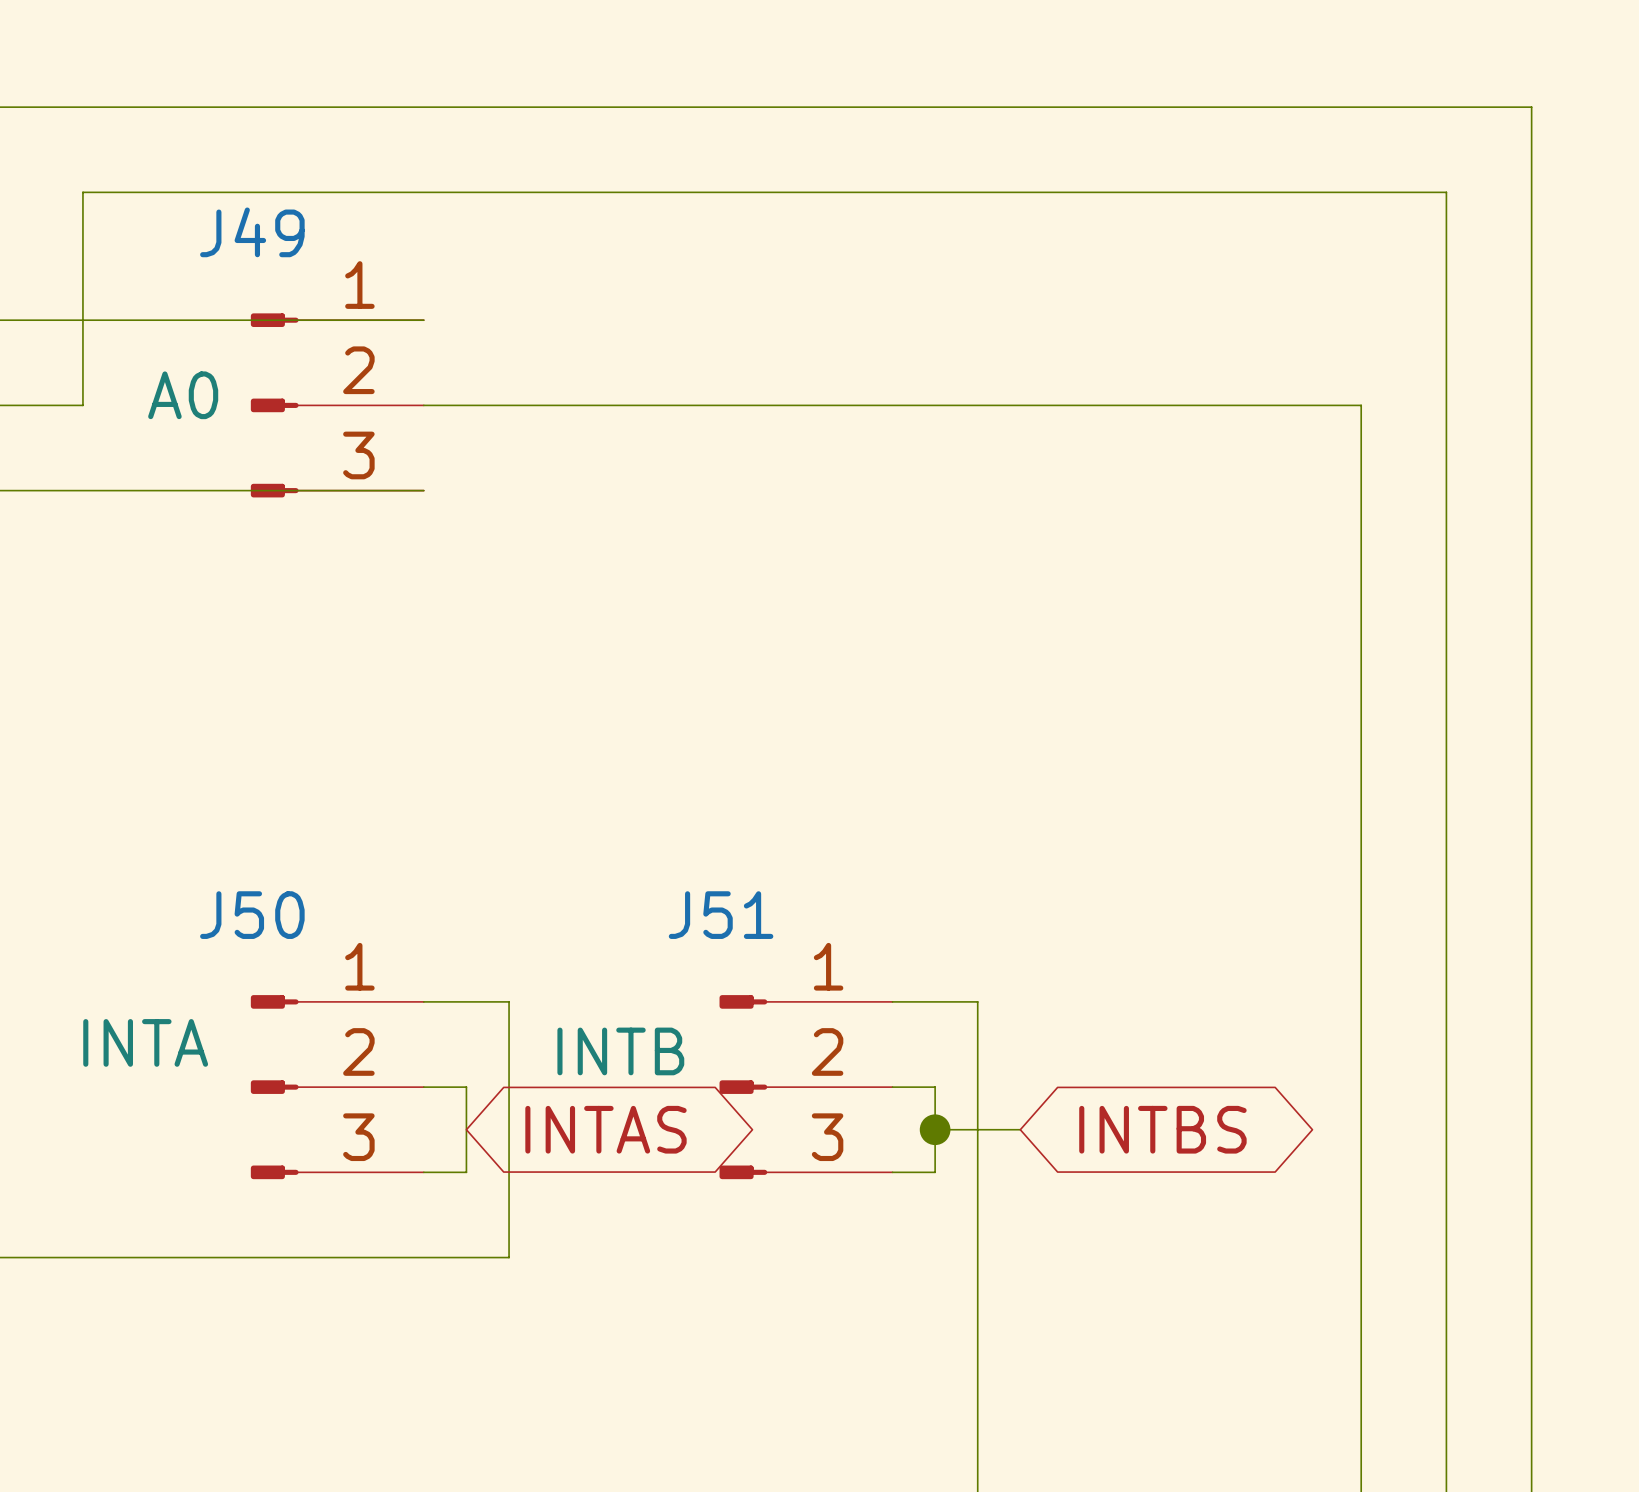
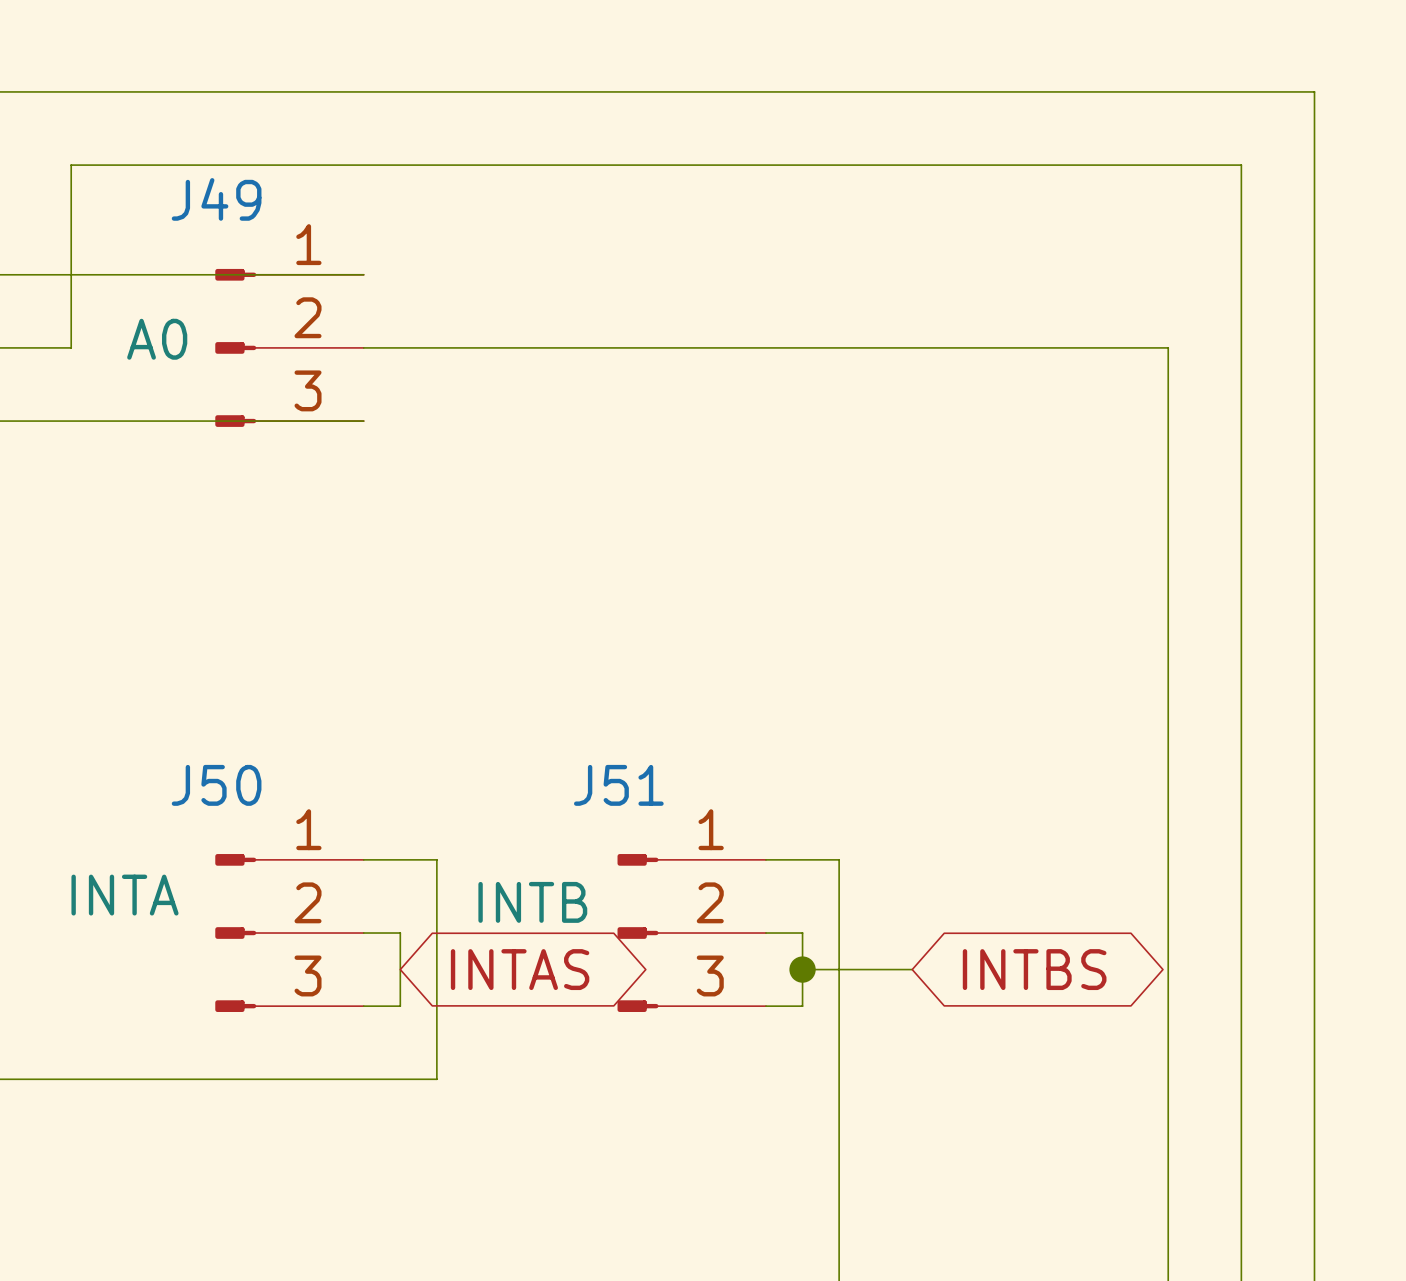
wire: none -> (875, 969) (912, 969)
global label position: INTBS (1162, 1129) -> INTBS (1034, 969)

